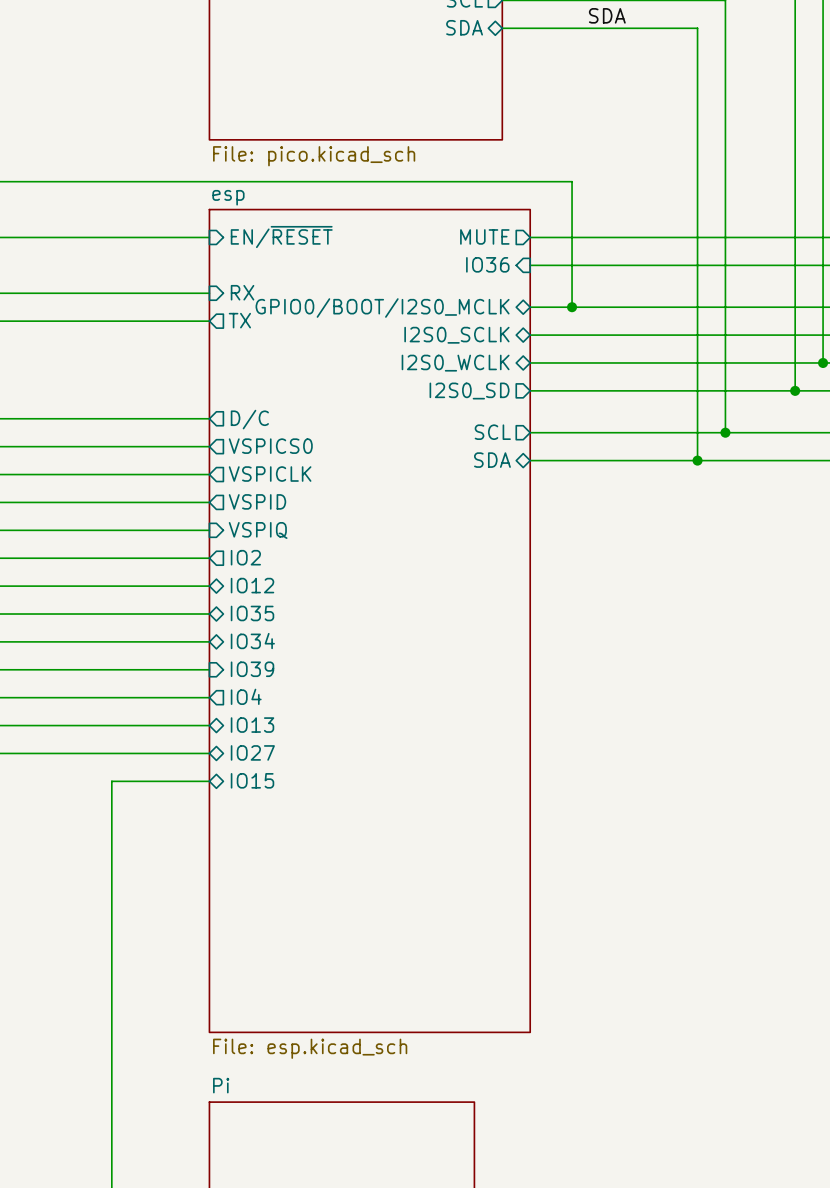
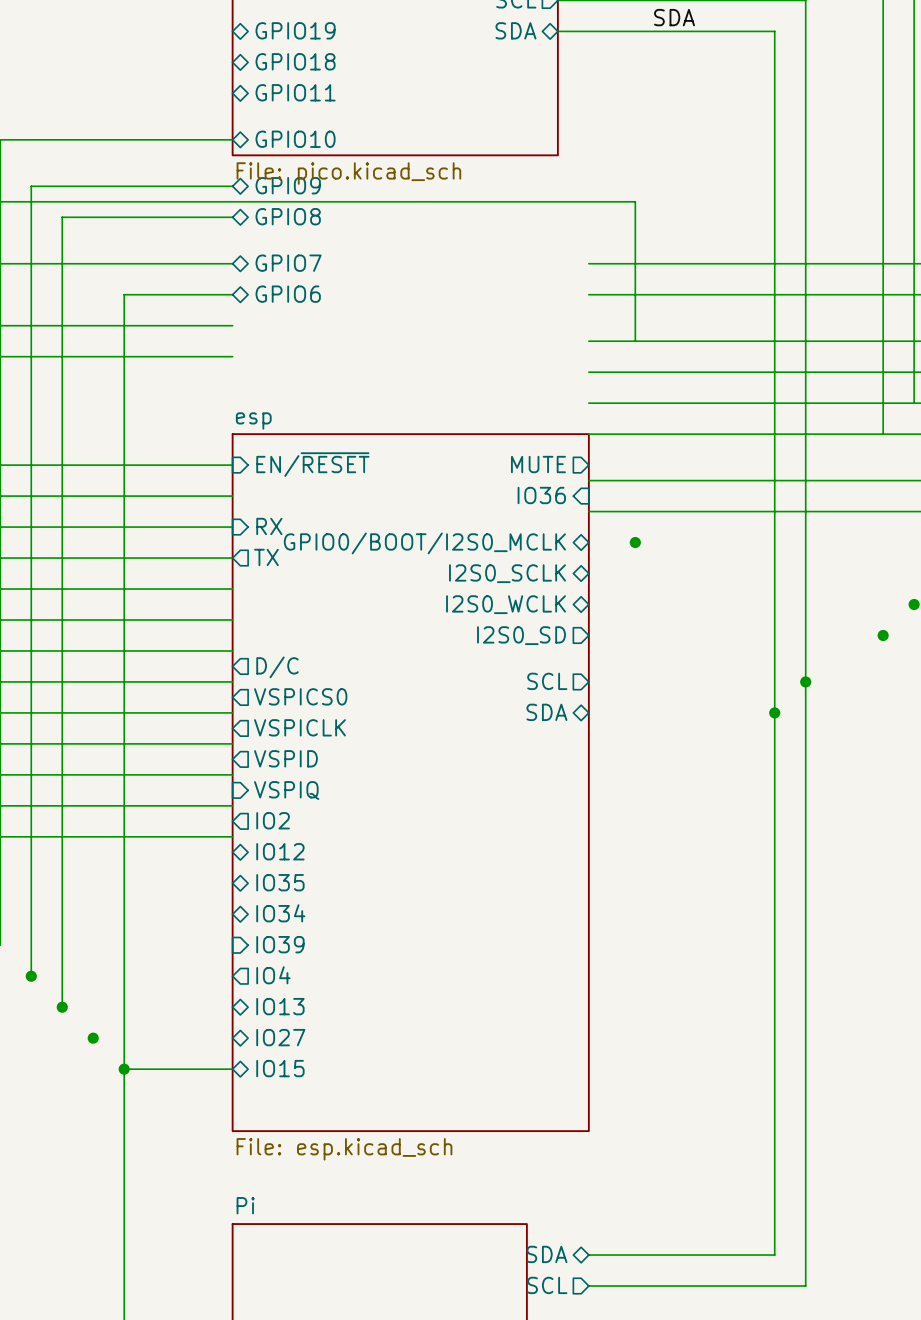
sheet pin: none -> GPIO19 (295, 30)
sheet pin: none -> GPIO18 (295, 61)
sheet pin: none -> GPIO11 (295, 92)
wire: none -> (232, 139) (0, 139) (0, 945)
sheet pin: none -> GPIO10 (295, 139)
wire: none -> (232, 186) (31, 186) (31, 976)
sheet pin: none -> GPIO9 (288, 185)
wire: none -> (232, 217) (62, 217) (62, 1007)
sheet pin: none -> GPIO8 (288, 216)
sheet pin position: MUTE (484, 236) -> MUTE (538, 464)
sheet pin shape: input (281, 237) -> bidirectional (288, 263)
sheet pin: EN/~{RESET} (281, 237) -> GPIO7 (288, 263)
sheet pin: none -> GPIO6 (288, 294)
sheet pin position: IO36 (487, 264) -> IO36 (541, 495)
sheet pin: RX (242, 292) -> none
junction: (572, 307) -> none
sheet pin position: GPIO0/BOOT/I2S0_MCLK (382, 308) -> GPIO0/BOOT/I2S0_MCLK (424, 543)
sheet pin: TX (239, 320) -> none
sheet pin position: I2S0_SCLK (456, 335) -> I2S0_SCLK (507, 573)
junction: (823, 362) -> none
sheet pin position: I2S0_WCLK (455, 363) -> I2S0_WCLK (506, 604)
junction: (795, 390) -> none
sheet pin position: I2S0_SD (469, 391) -> I2S0_SD (521, 635)
sheet pin shape: output (249, 419) -> input (312, 464)
sheet pin: D/C (249, 419) -> EN/~{RESET} (312, 464)
sheet pin position: SCL (492, 432) -> SCL (547, 681)
wire: none -> (805, 480) (805, 1286) (588, 1286)
junction: (725, 432) -> none
sheet pin position: VSPICS0 (270, 446) -> VSPICS0 (300, 696)
sheet pin position: SDA (492, 460) -> SDA (546, 712)
wire: none -> (774, 511) (774, 1255) (588, 1255)
junction: (697, 460) -> none
sheet pin shape: output (270, 474) -> input (269, 526)
sheet pin: VSPICLK (270, 474) -> RX (269, 526)
junction: none -> (635, 542)
sheet pin: VSPID (257, 501) -> TX (266, 557)
sheet pin position: VSPIQ (258, 530) -> VSPIQ (286, 790)
junction: none -> (914, 604)
sheet pin position: IO2 (245, 557) -> IO2 (273, 820)
junction: none -> (883, 635)
sheet pin position: IO12 (252, 585) -> IO12 (280, 851)
sheet pin: none -> D/C (277, 667)
sheet pin position: IO35 (252, 613) -> IO35 (280, 882)
junction: none -> (805, 681)
sheet esp: File: esp.kicad_sch (369, 620) -> none
sheet pin position: IO34 (252, 641) -> IO34 (280, 913)
junction: none -> (774, 712)
sheet pin: none -> VSPICLK (299, 727)
sheet pin position: IO39 (252, 669) -> IO39 (280, 944)
sheet pin: none -> VSPID (285, 758)
sheet pin position: IO4 (246, 696) -> IO4 (273, 975)
sheet esp: none -> File: esp.kicad_sch (410, 782)
sheet pin position: IO13 (252, 725) -> IO13 (280, 1006)
sheet pin position: IO27 (252, 752) -> IO27 (280, 1037)
sheet pin position: IO15 (252, 780) -> IO15 (280, 1068)
wire: (111, 781) (209, 781) -> (124, 867) (124, 294) (232, 294)
junction: none -> (31, 976)
junction: none -> (62, 1007)
junction: none -> (93, 1038)
wire: none -> (124, 1069) (232, 1069)
junction: none -> (124, 1069)
sheet pin: none -> SDA (546, 1254)
sheet pin: none -> SCL (547, 1285)

